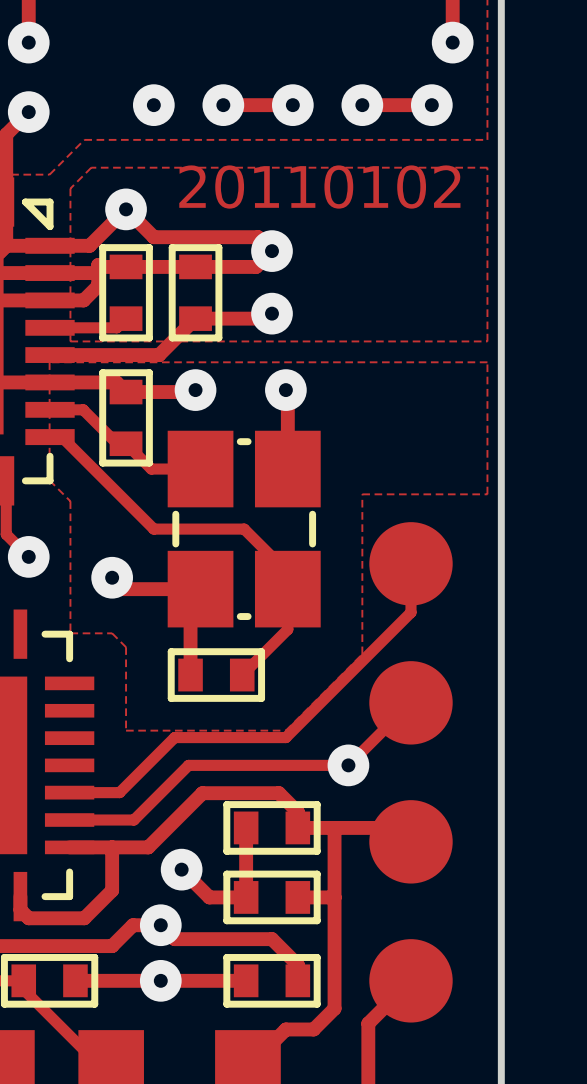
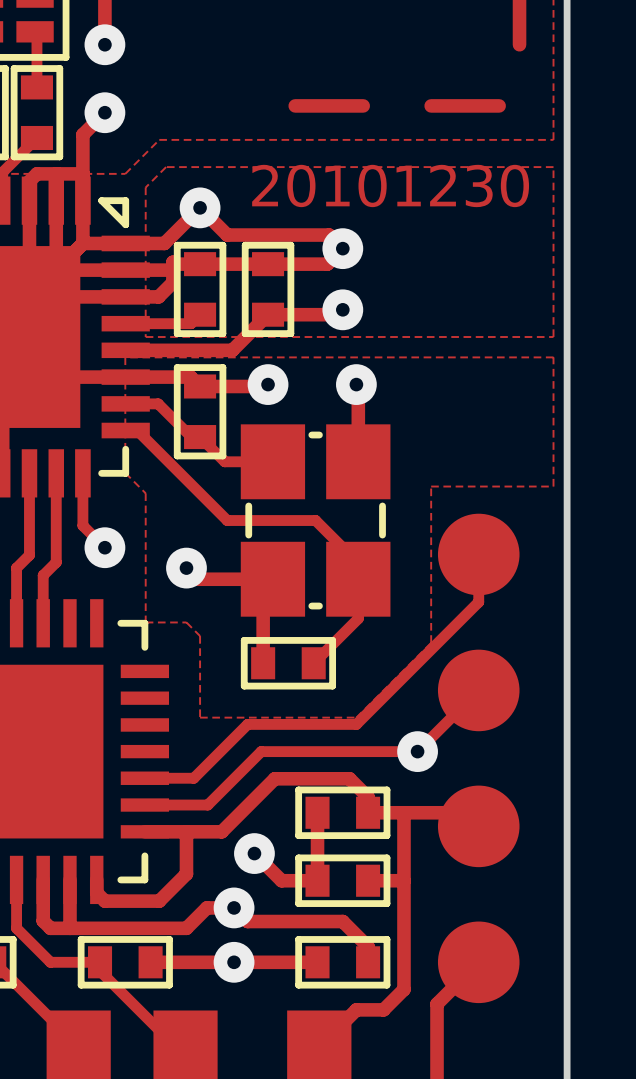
via: (452, 42) -> none
via: (153, 105) -> none
via: (223, 105) -> none
via: (292, 105) -> none
via: (362, 105) -> none
via: (431, 105) -> none
text: 20110102 (319, 187) -> 20101230 (390, 185)

